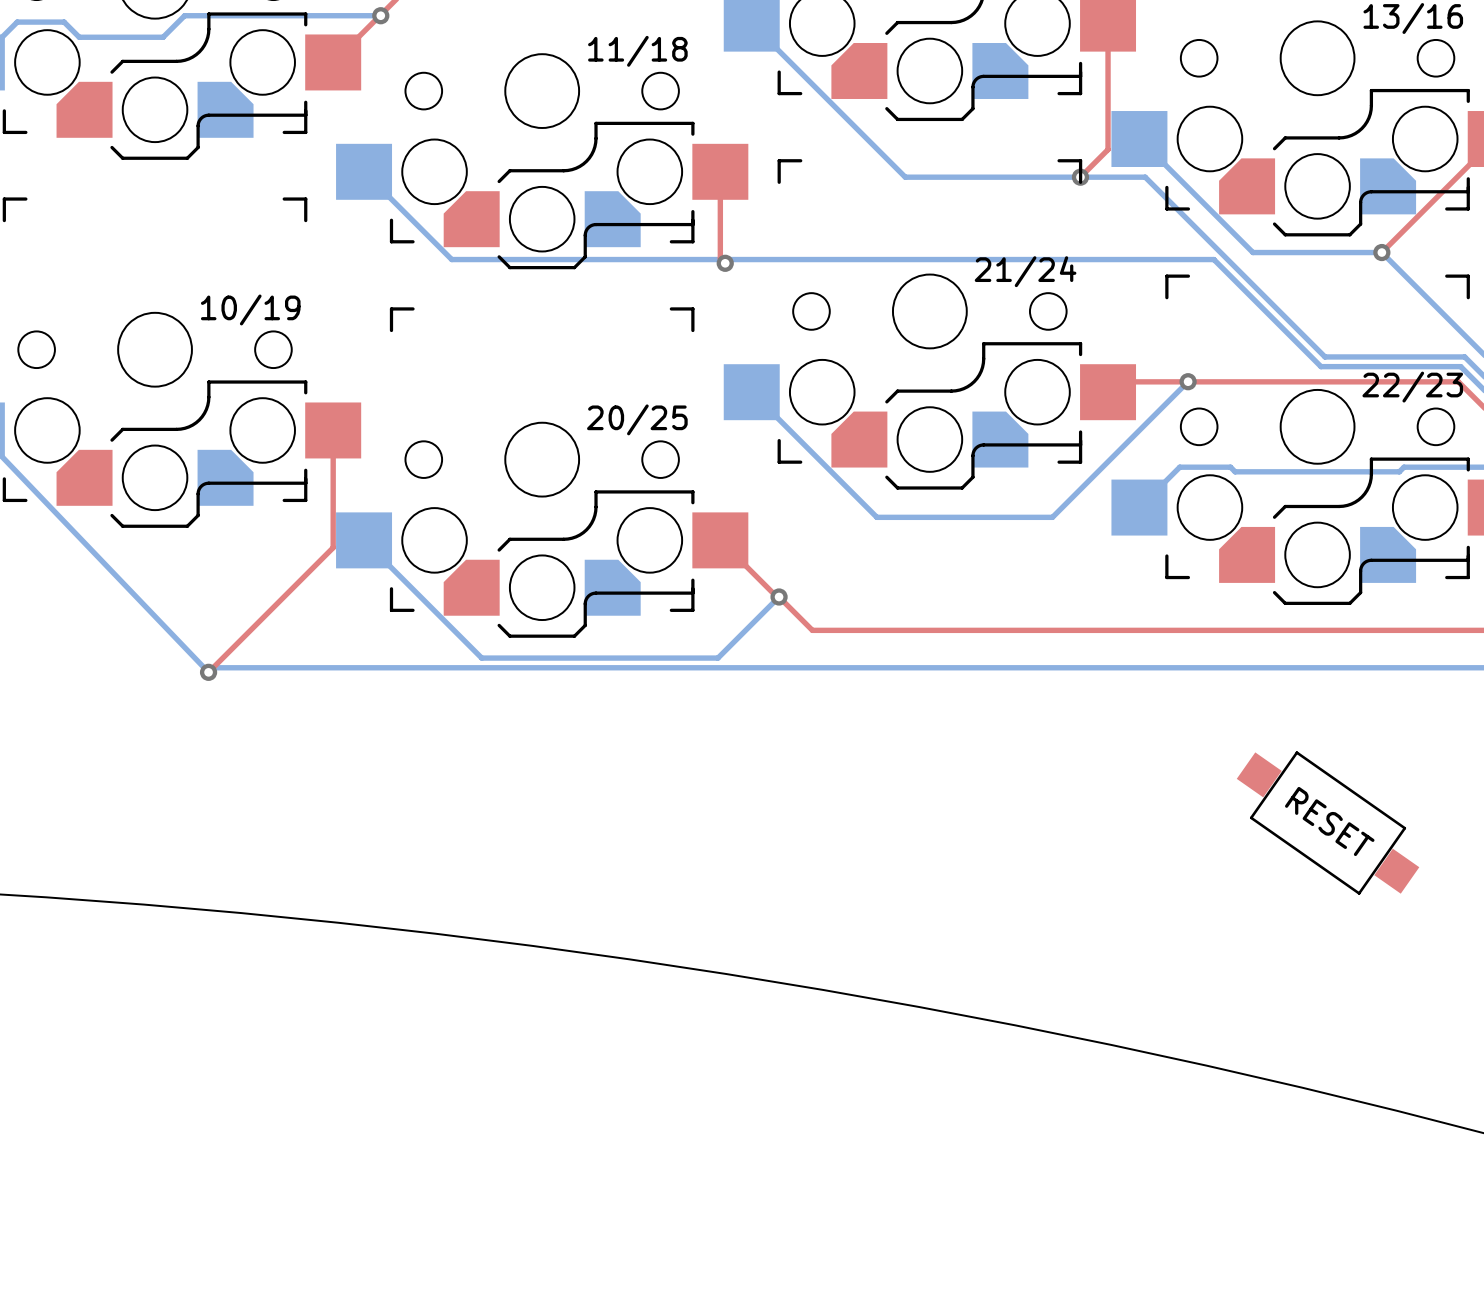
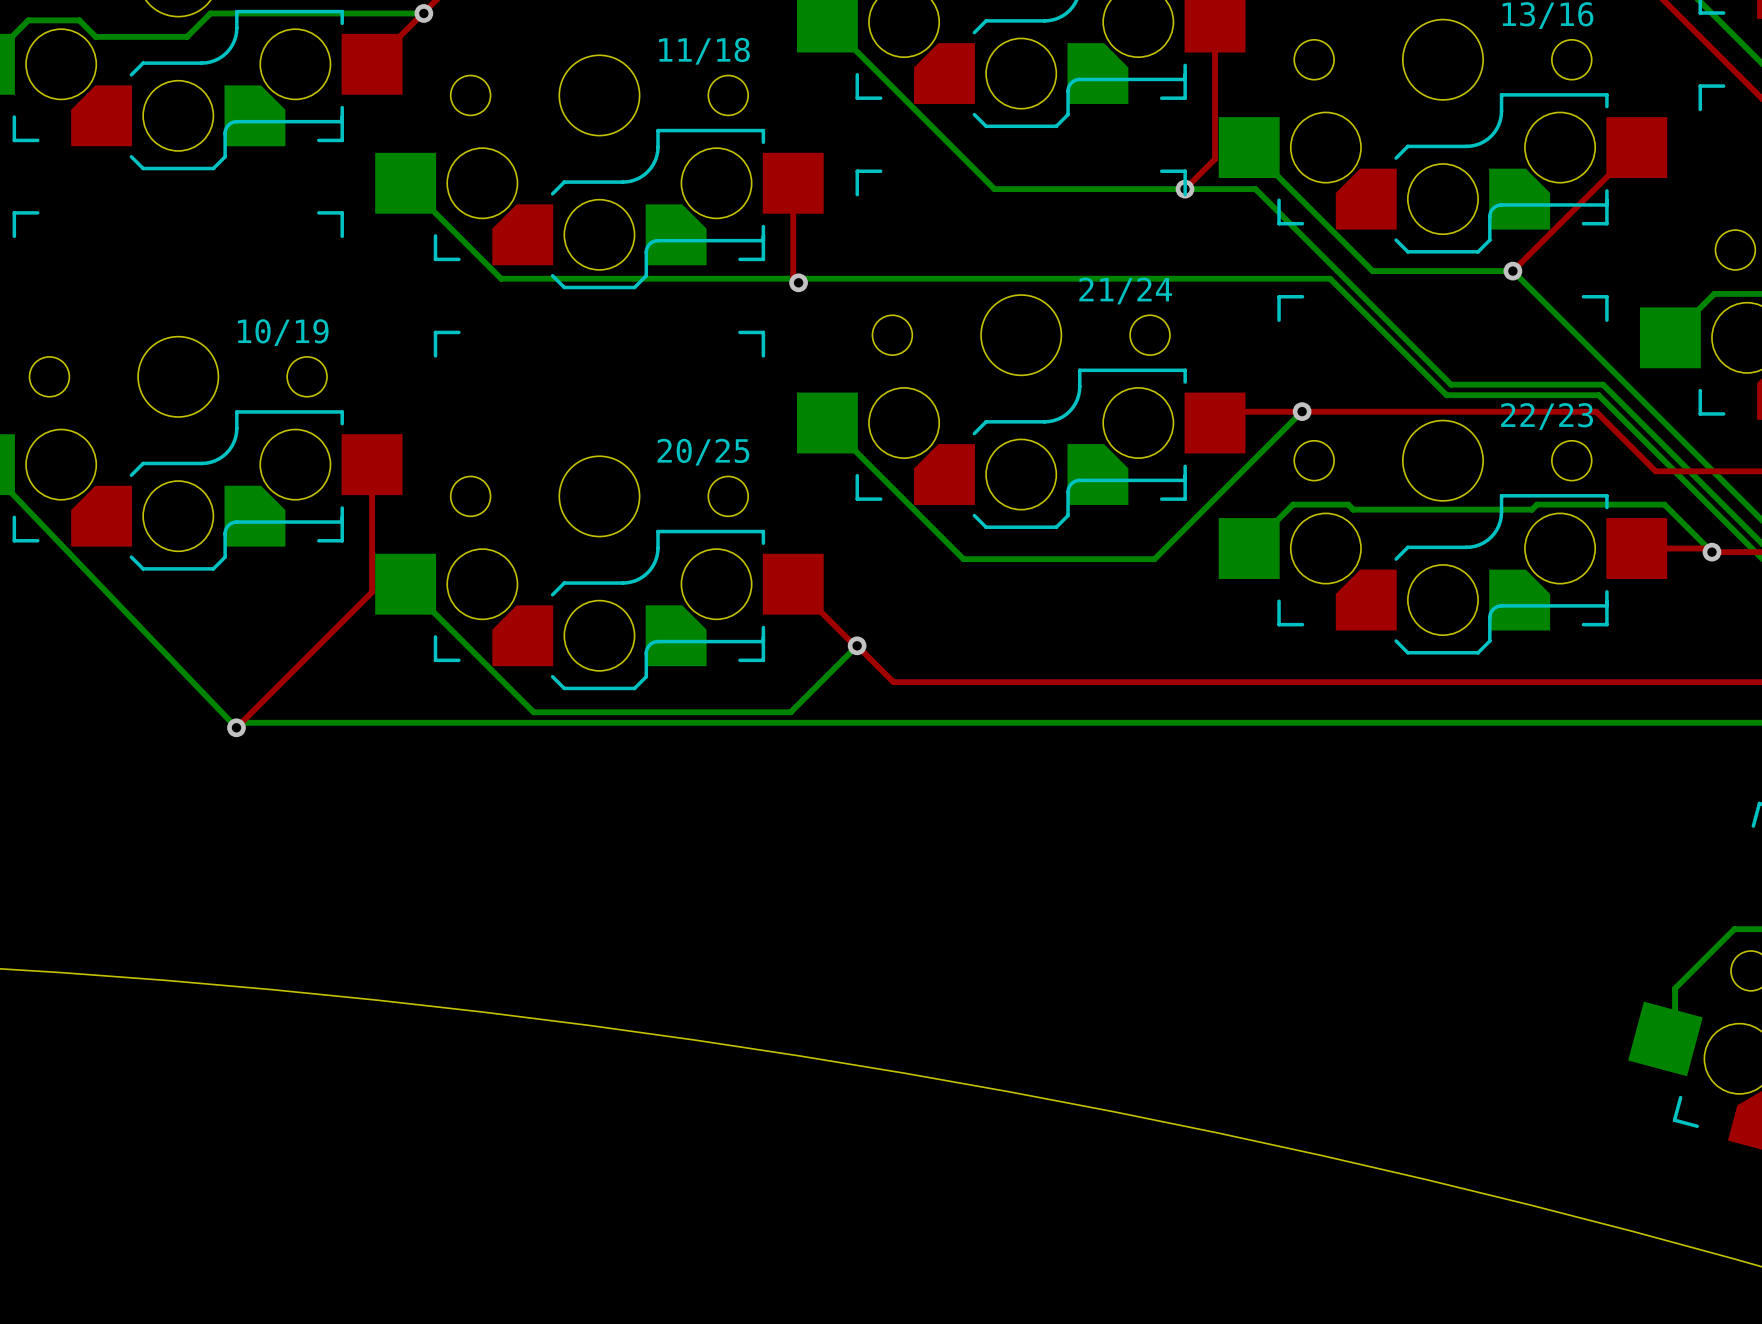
text: RESET (1329, 821) -> none
part: (1328, 823) -> none

